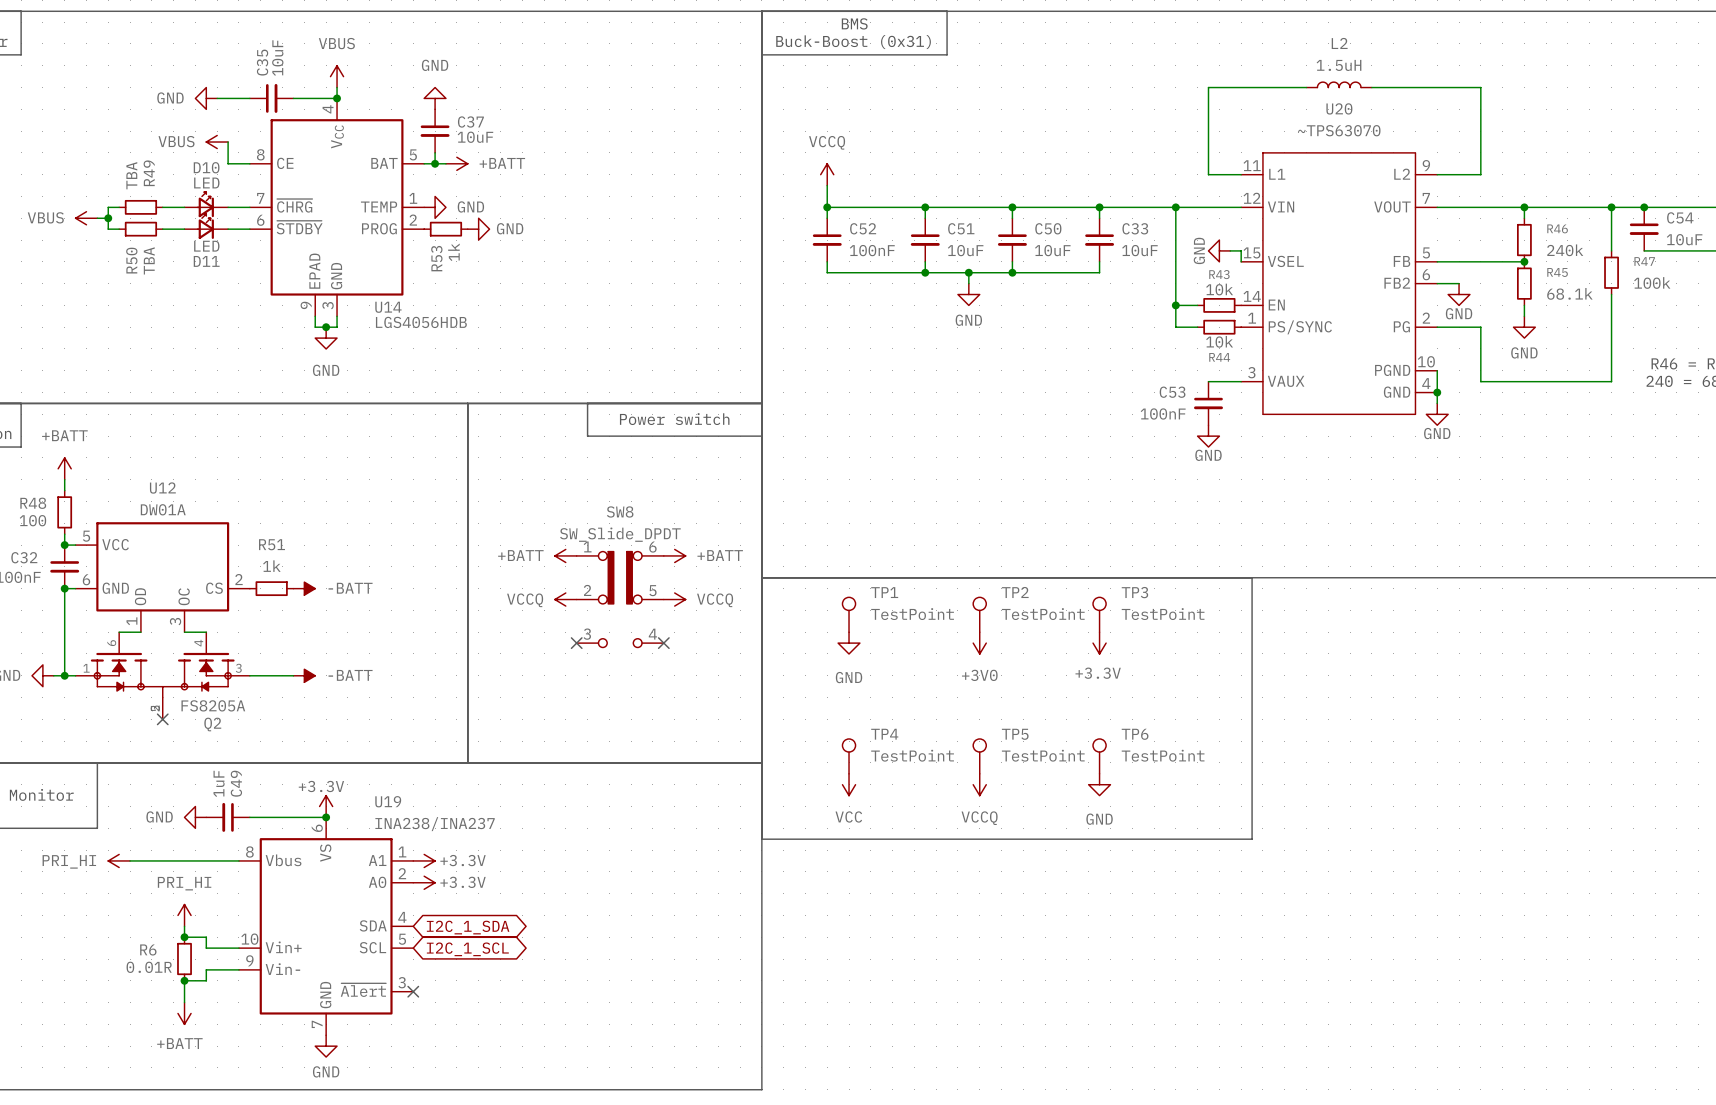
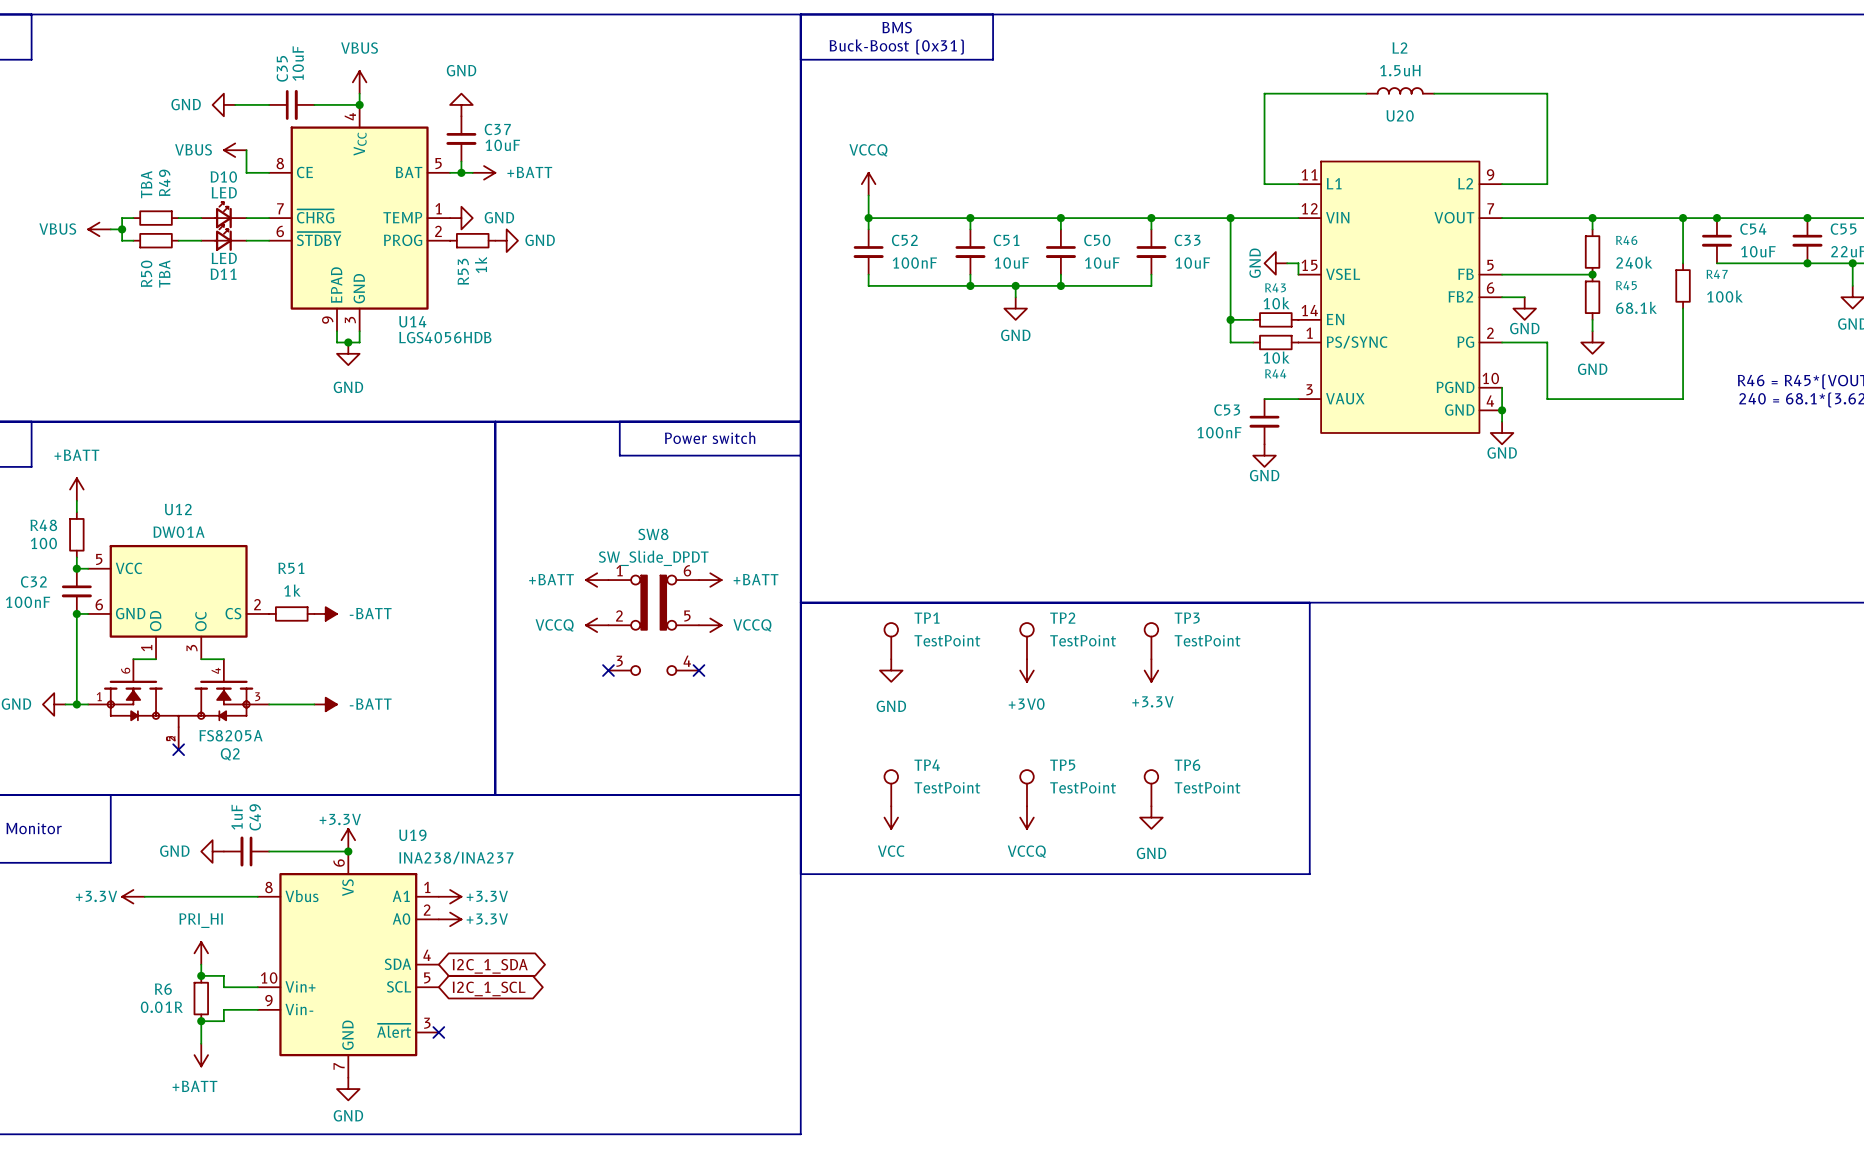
U20 value: ~TPS63070 (1339, 130) -> none
power symbol: PRI_HI (119, 860) -> +3.3V (133, 896)

